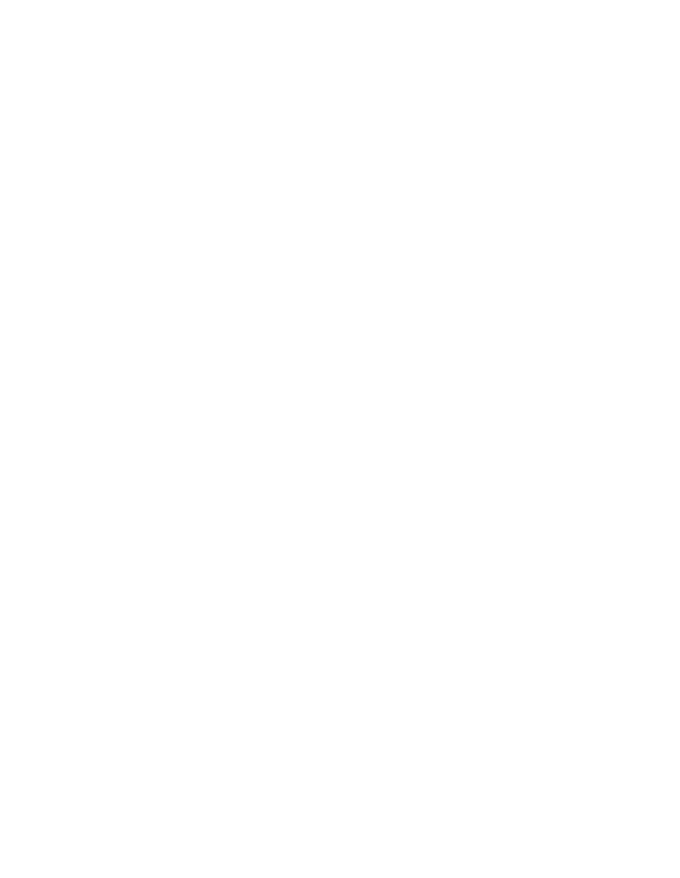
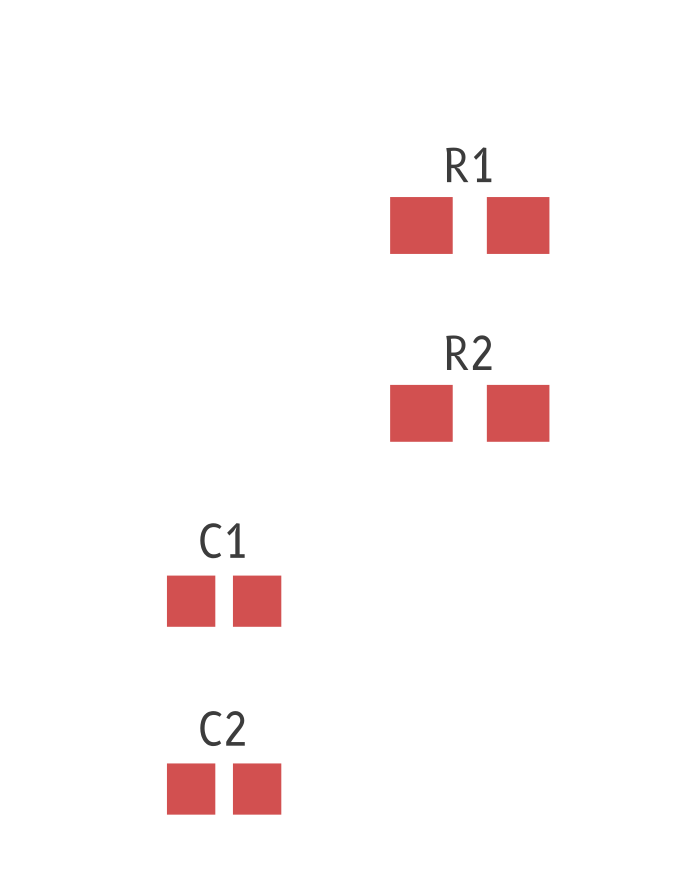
R1: none -> (469, 225)
R2: none -> (469, 413)
C1: none -> (224, 601)
C2: none -> (224, 789)

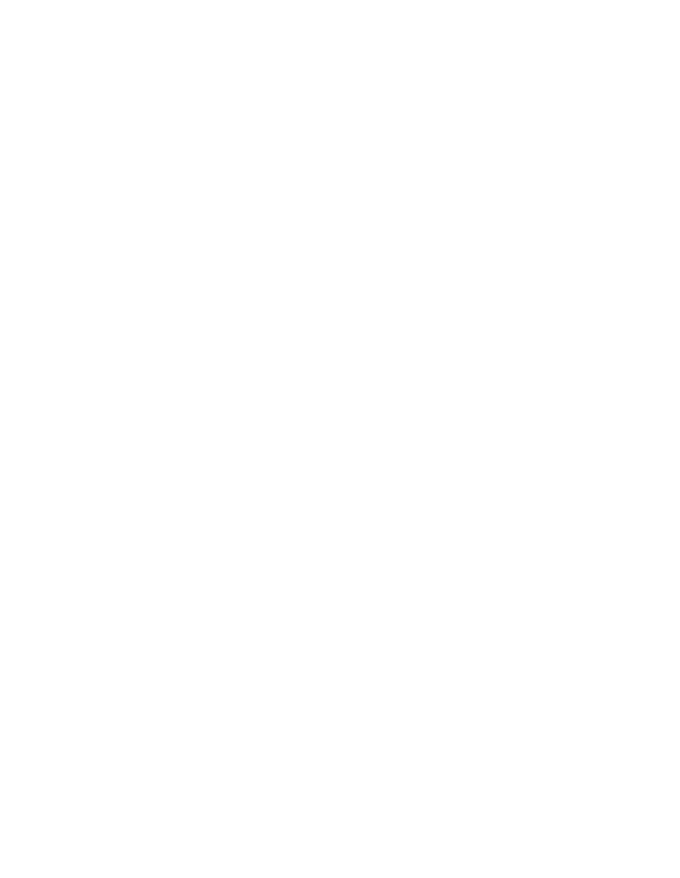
R1: (469, 225) -> none
R2: (469, 413) -> none
C1: (224, 601) -> none
C2: (224, 789) -> none

